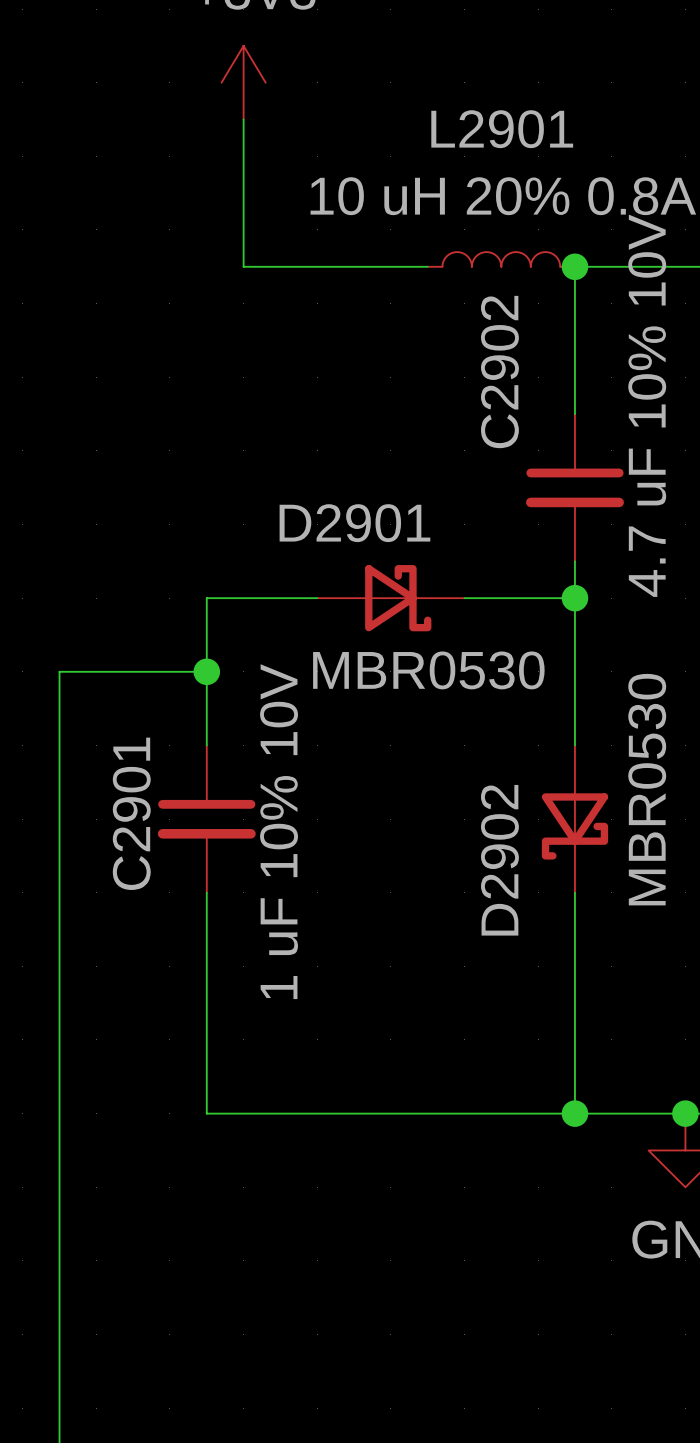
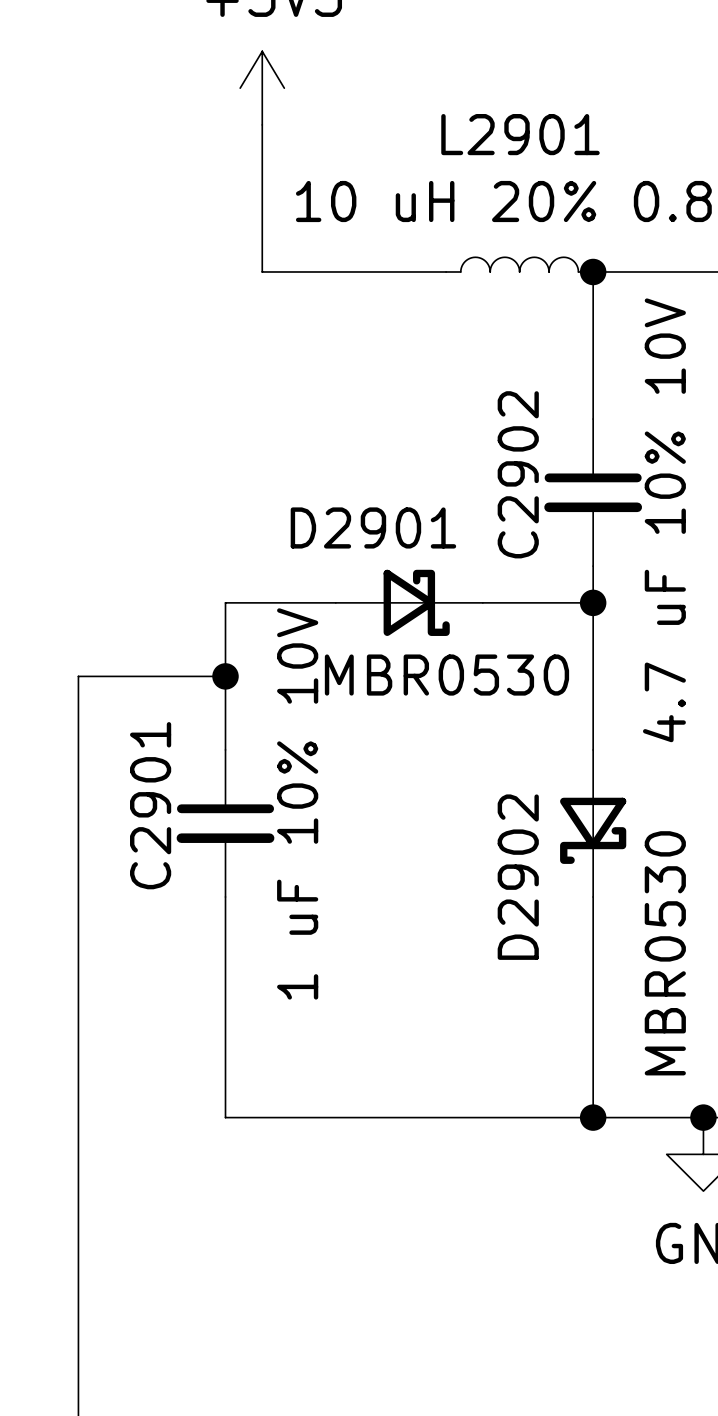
C2902 name position: C2902 (499, 372) -> C2902 (518, 474)
C2902 value position: 4.7 uF 10% 10V (647, 405) -> 4.7 uF 10% 10V (664, 520)
D2902 value position: MBR0530 (647, 789) -> MBR0530 (665, 953)

